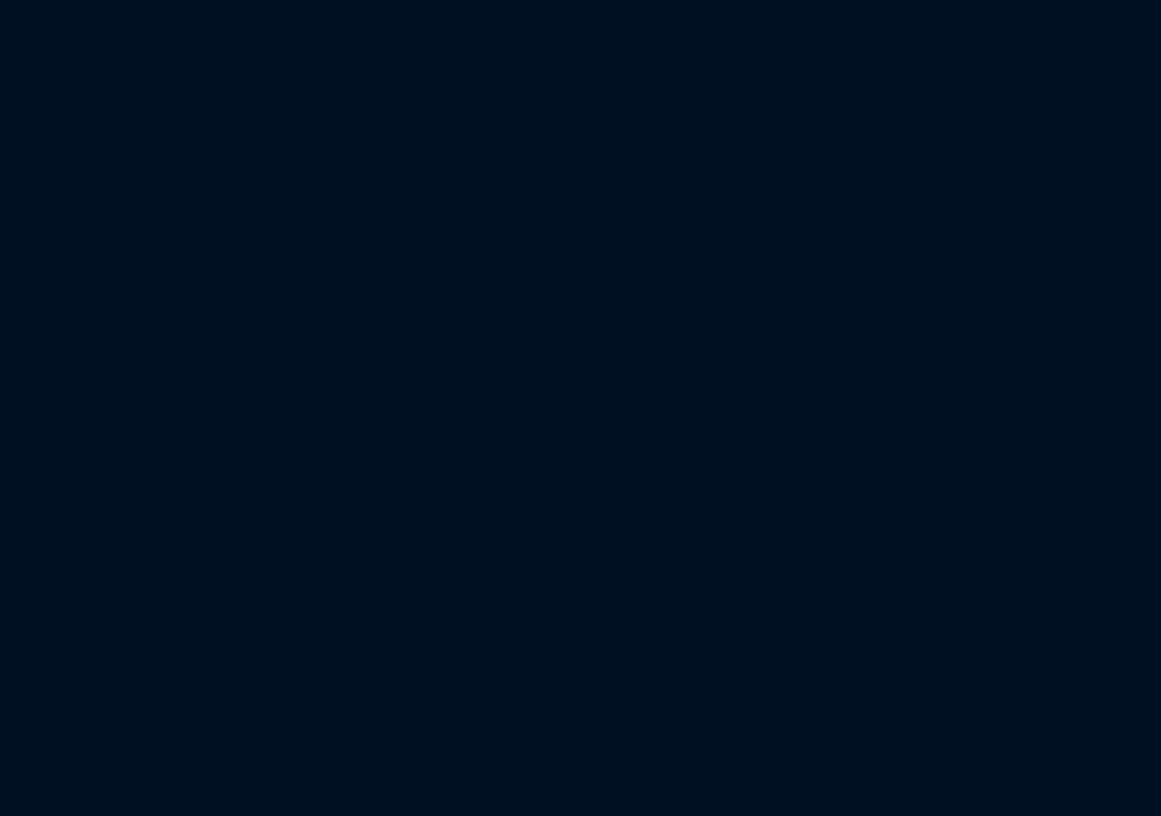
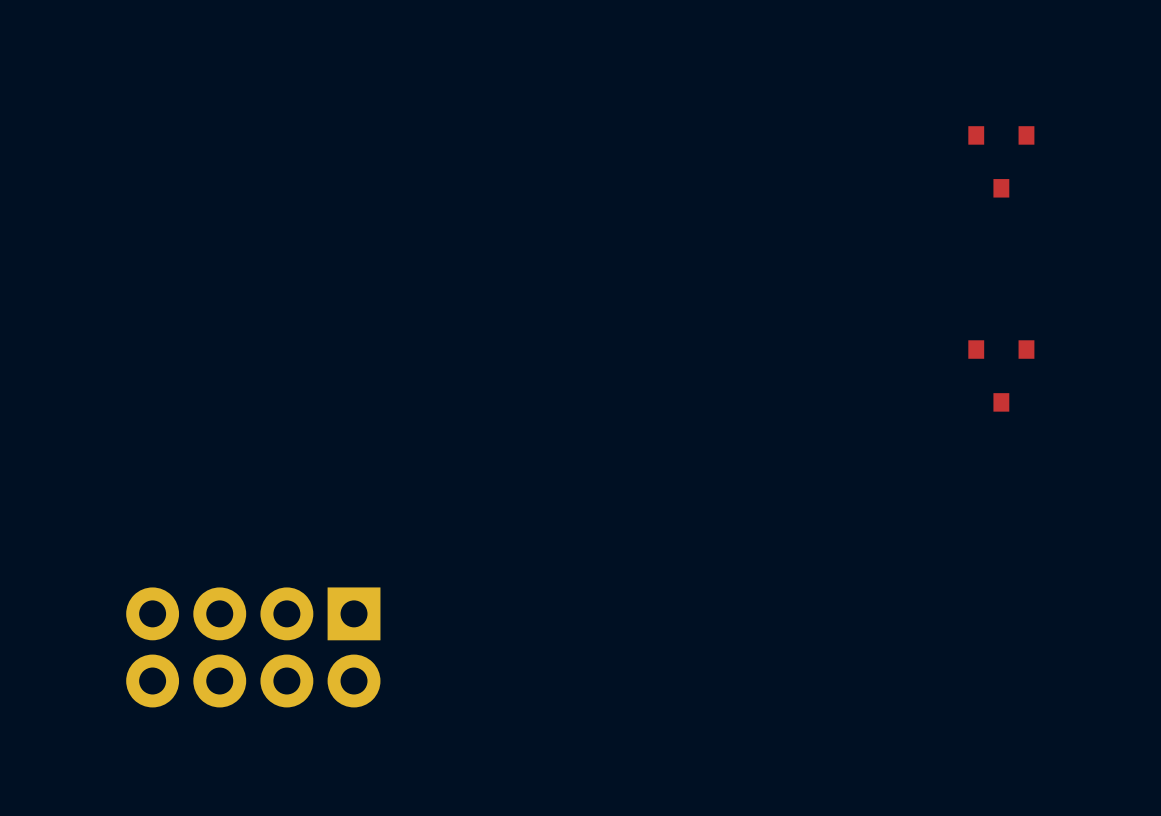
part: none -> (1001, 161)
part: none -> (1001, 375)
part: none -> (253, 647)

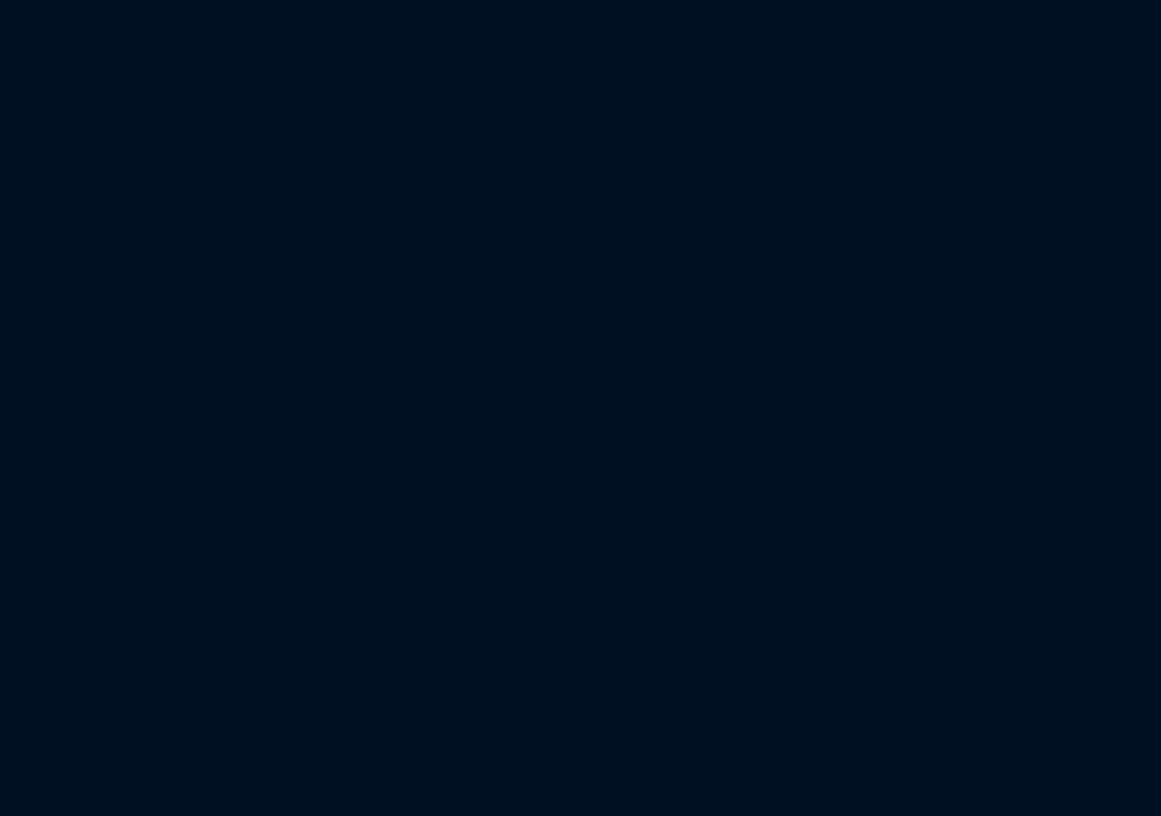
part: (1001, 161) -> none
part: (1001, 375) -> none
part: (253, 647) -> none

